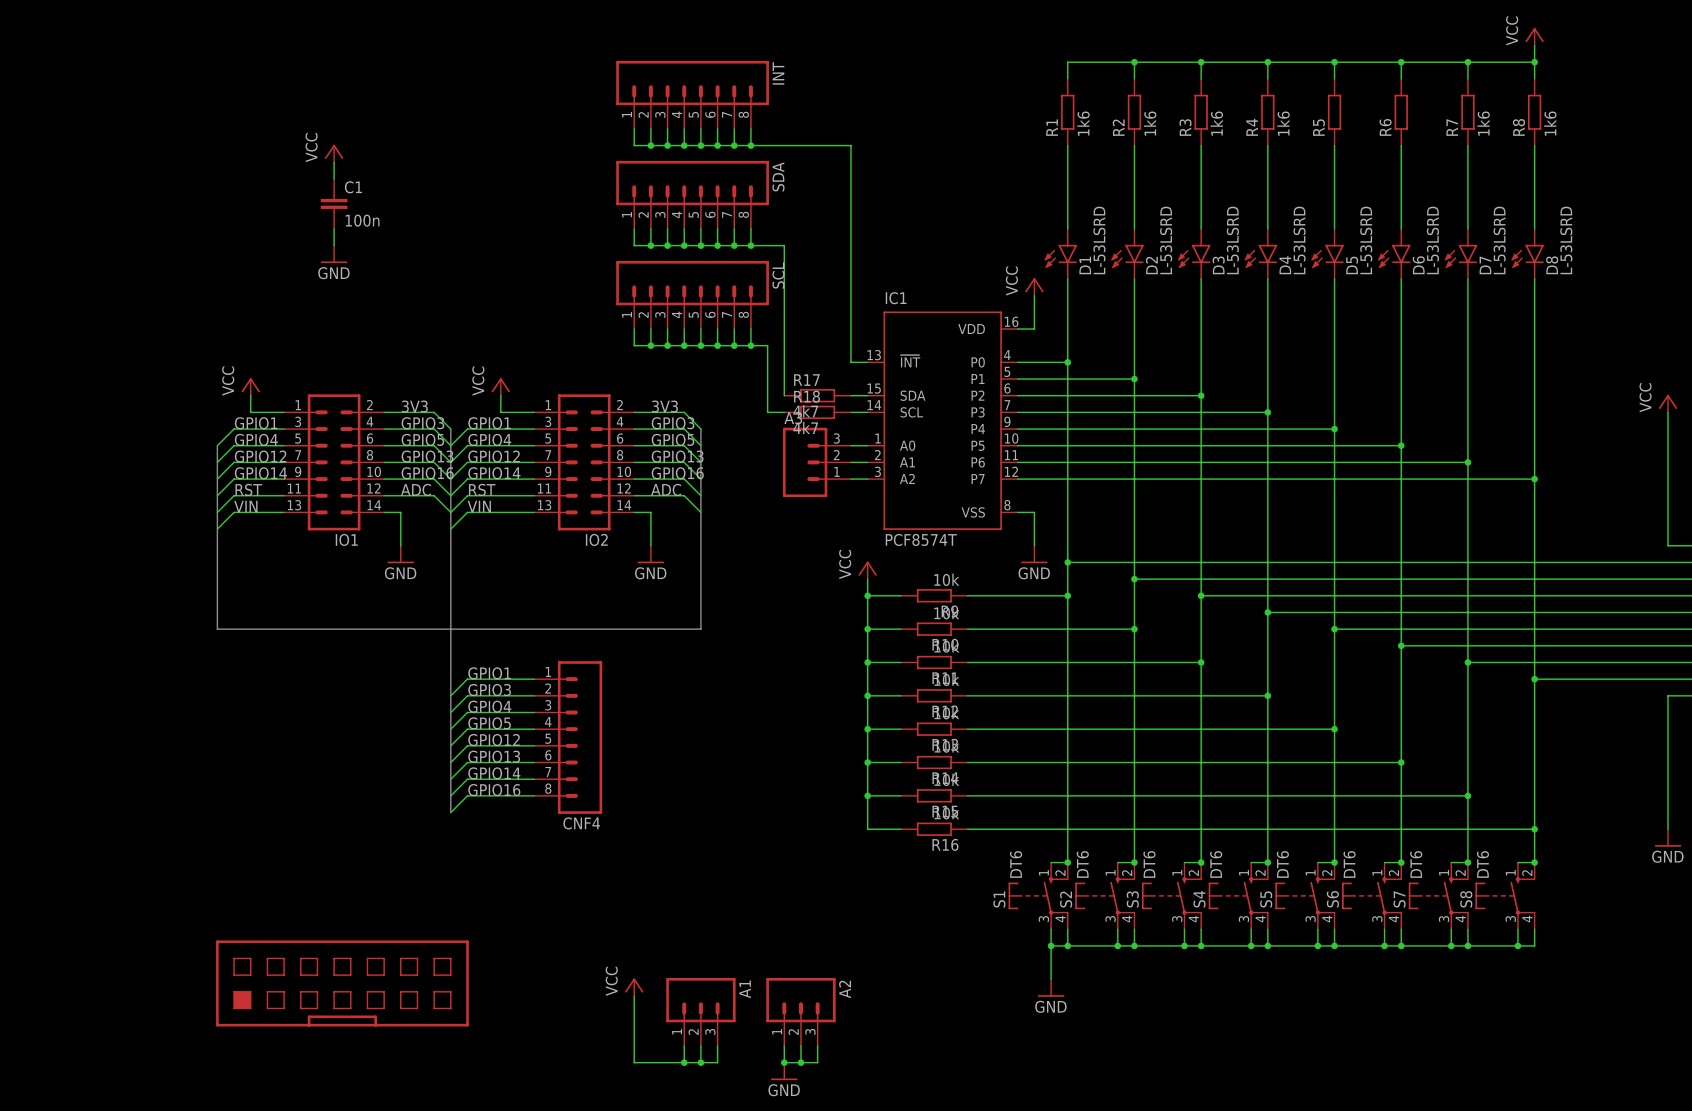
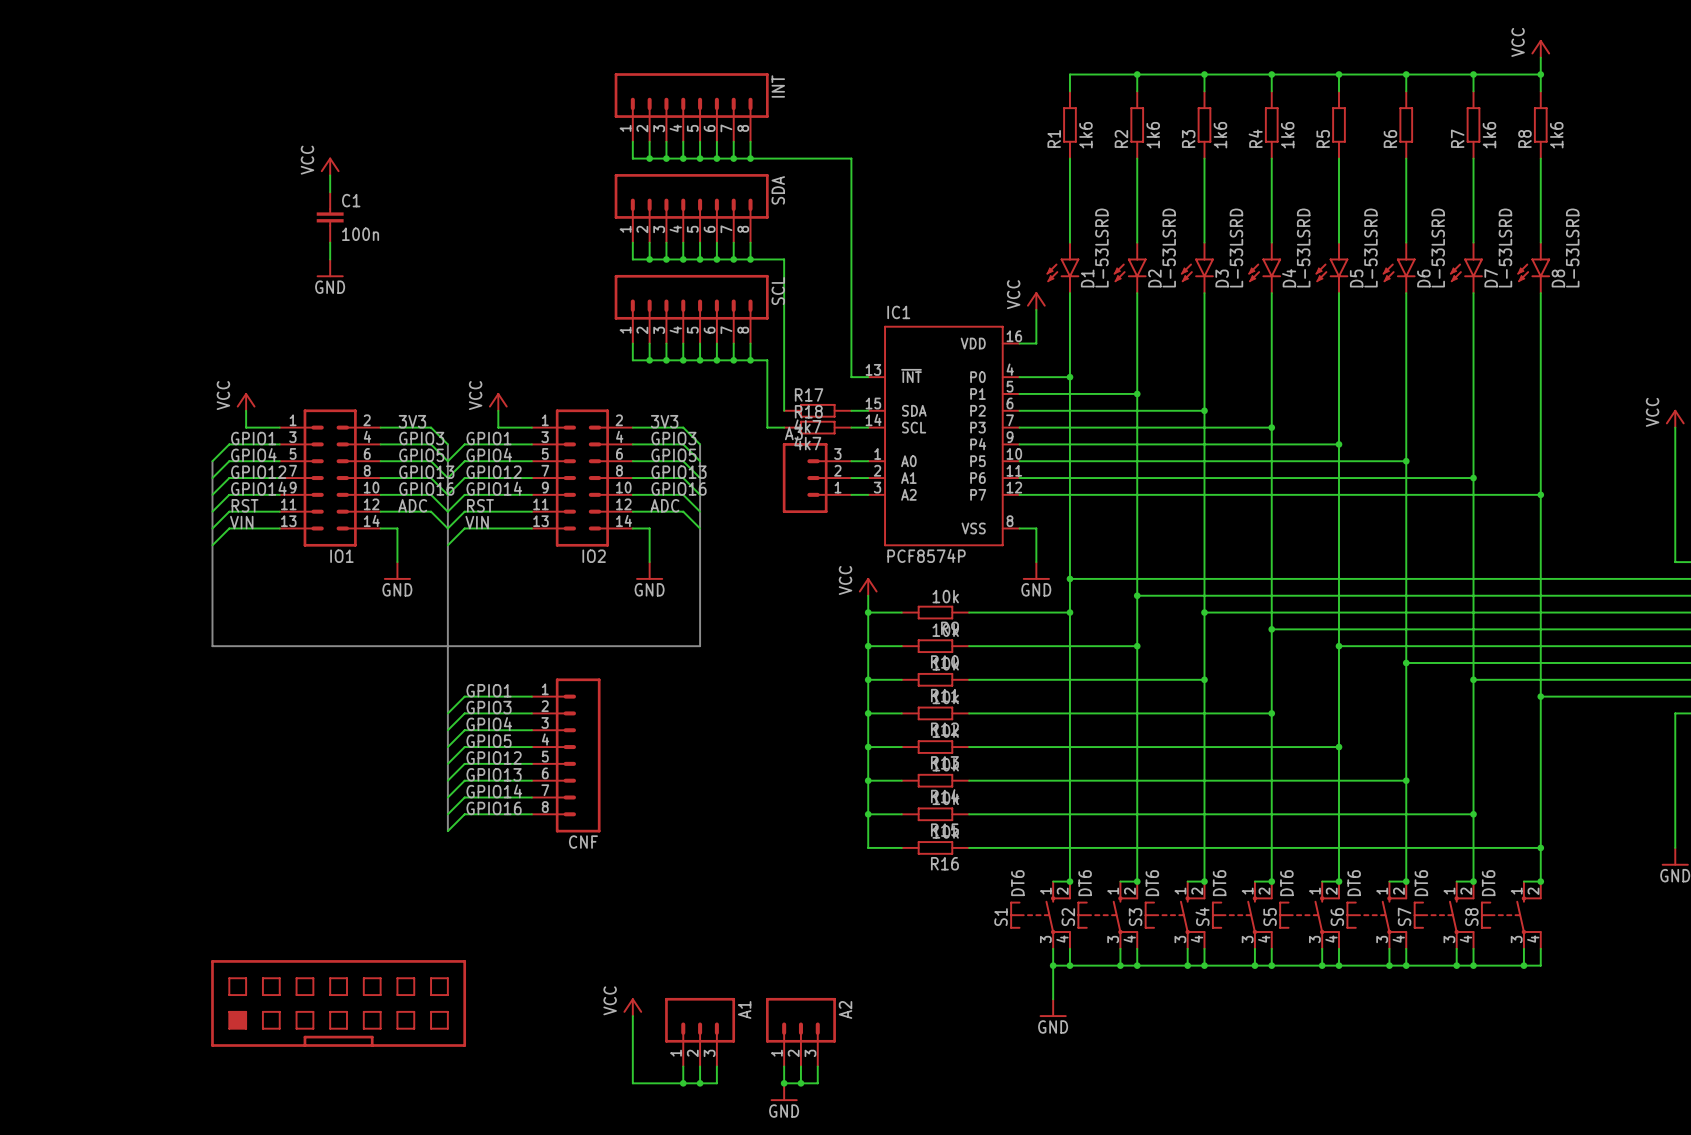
IC1 value: PCF8574T (921, 539) -> PCF8574P (926, 555)
CNF4 name: CNF4 (581, 823) -> CNF (583, 842)

